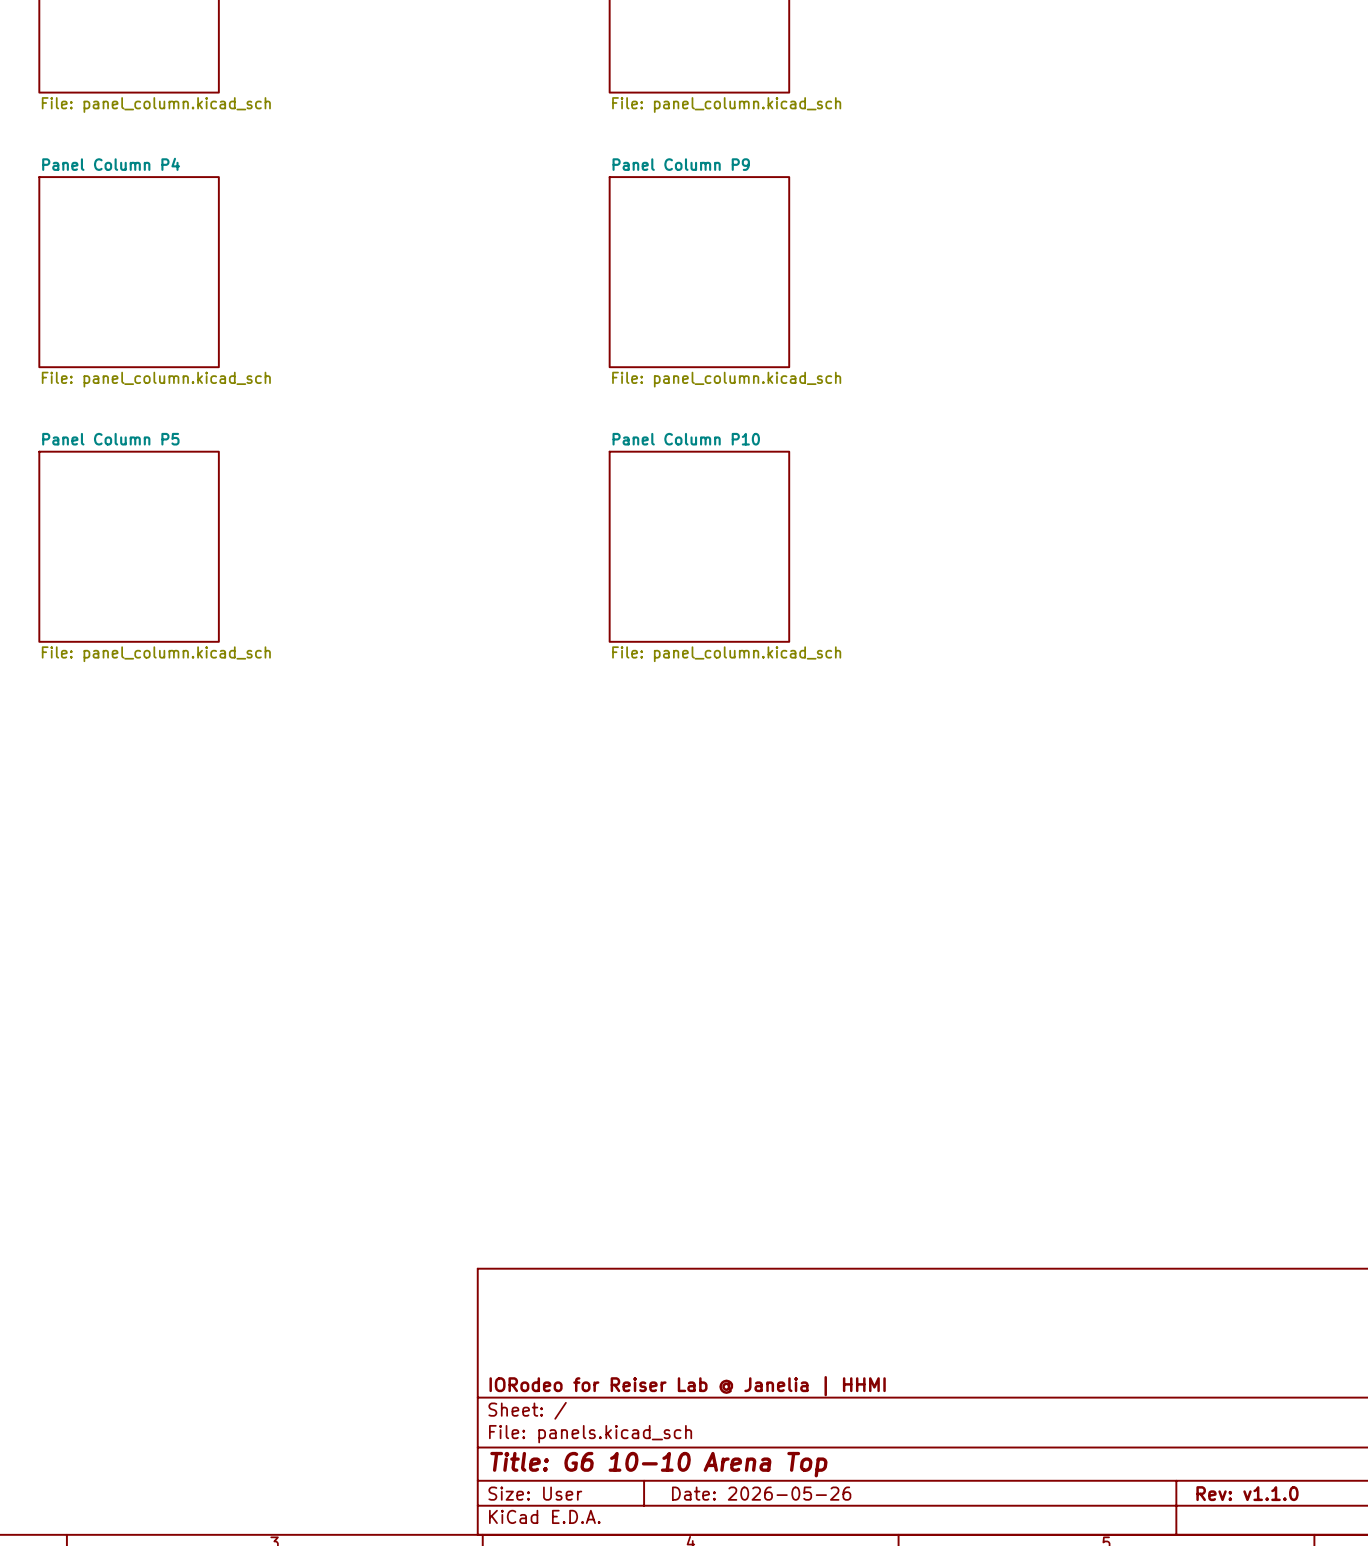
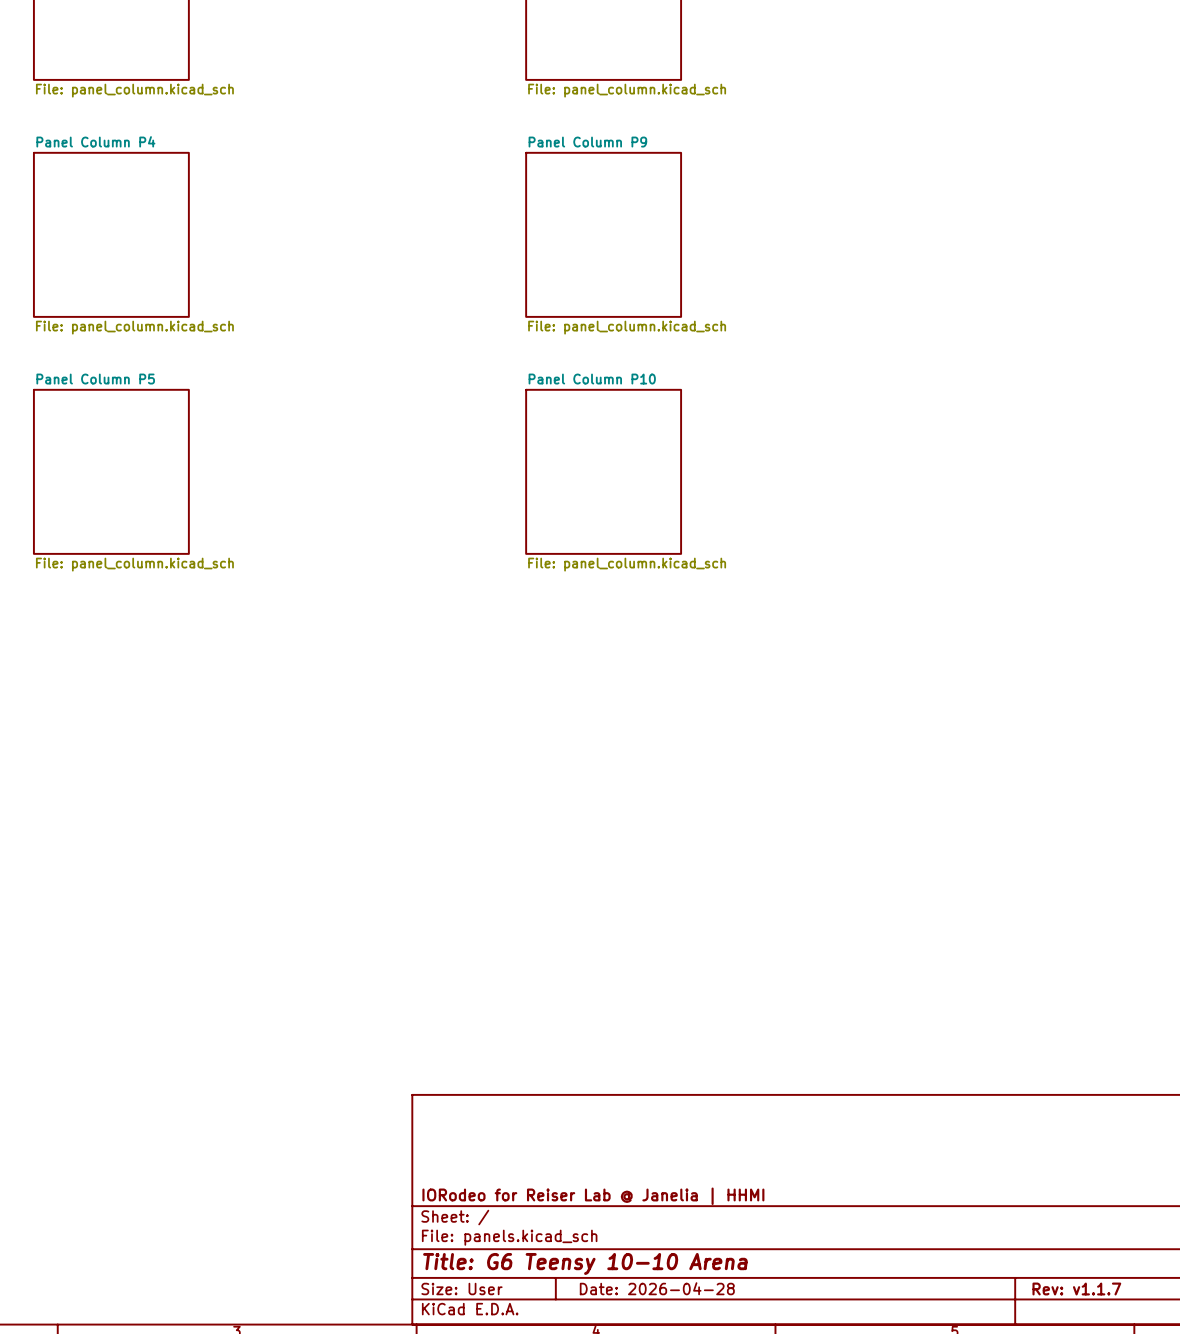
title block: Title: G6 10-10 Arena Top (658, 1464) -> Title: G6 Teensy 10-10 Arena (585, 1263)
title block: Date: 2026-05-26 (761, 1493) -> Date: 2026-04-28 (657, 1288)
title block: Rev: v1.1.0 (1247, 1493) -> Rev: v1.1.7 (1076, 1289)

